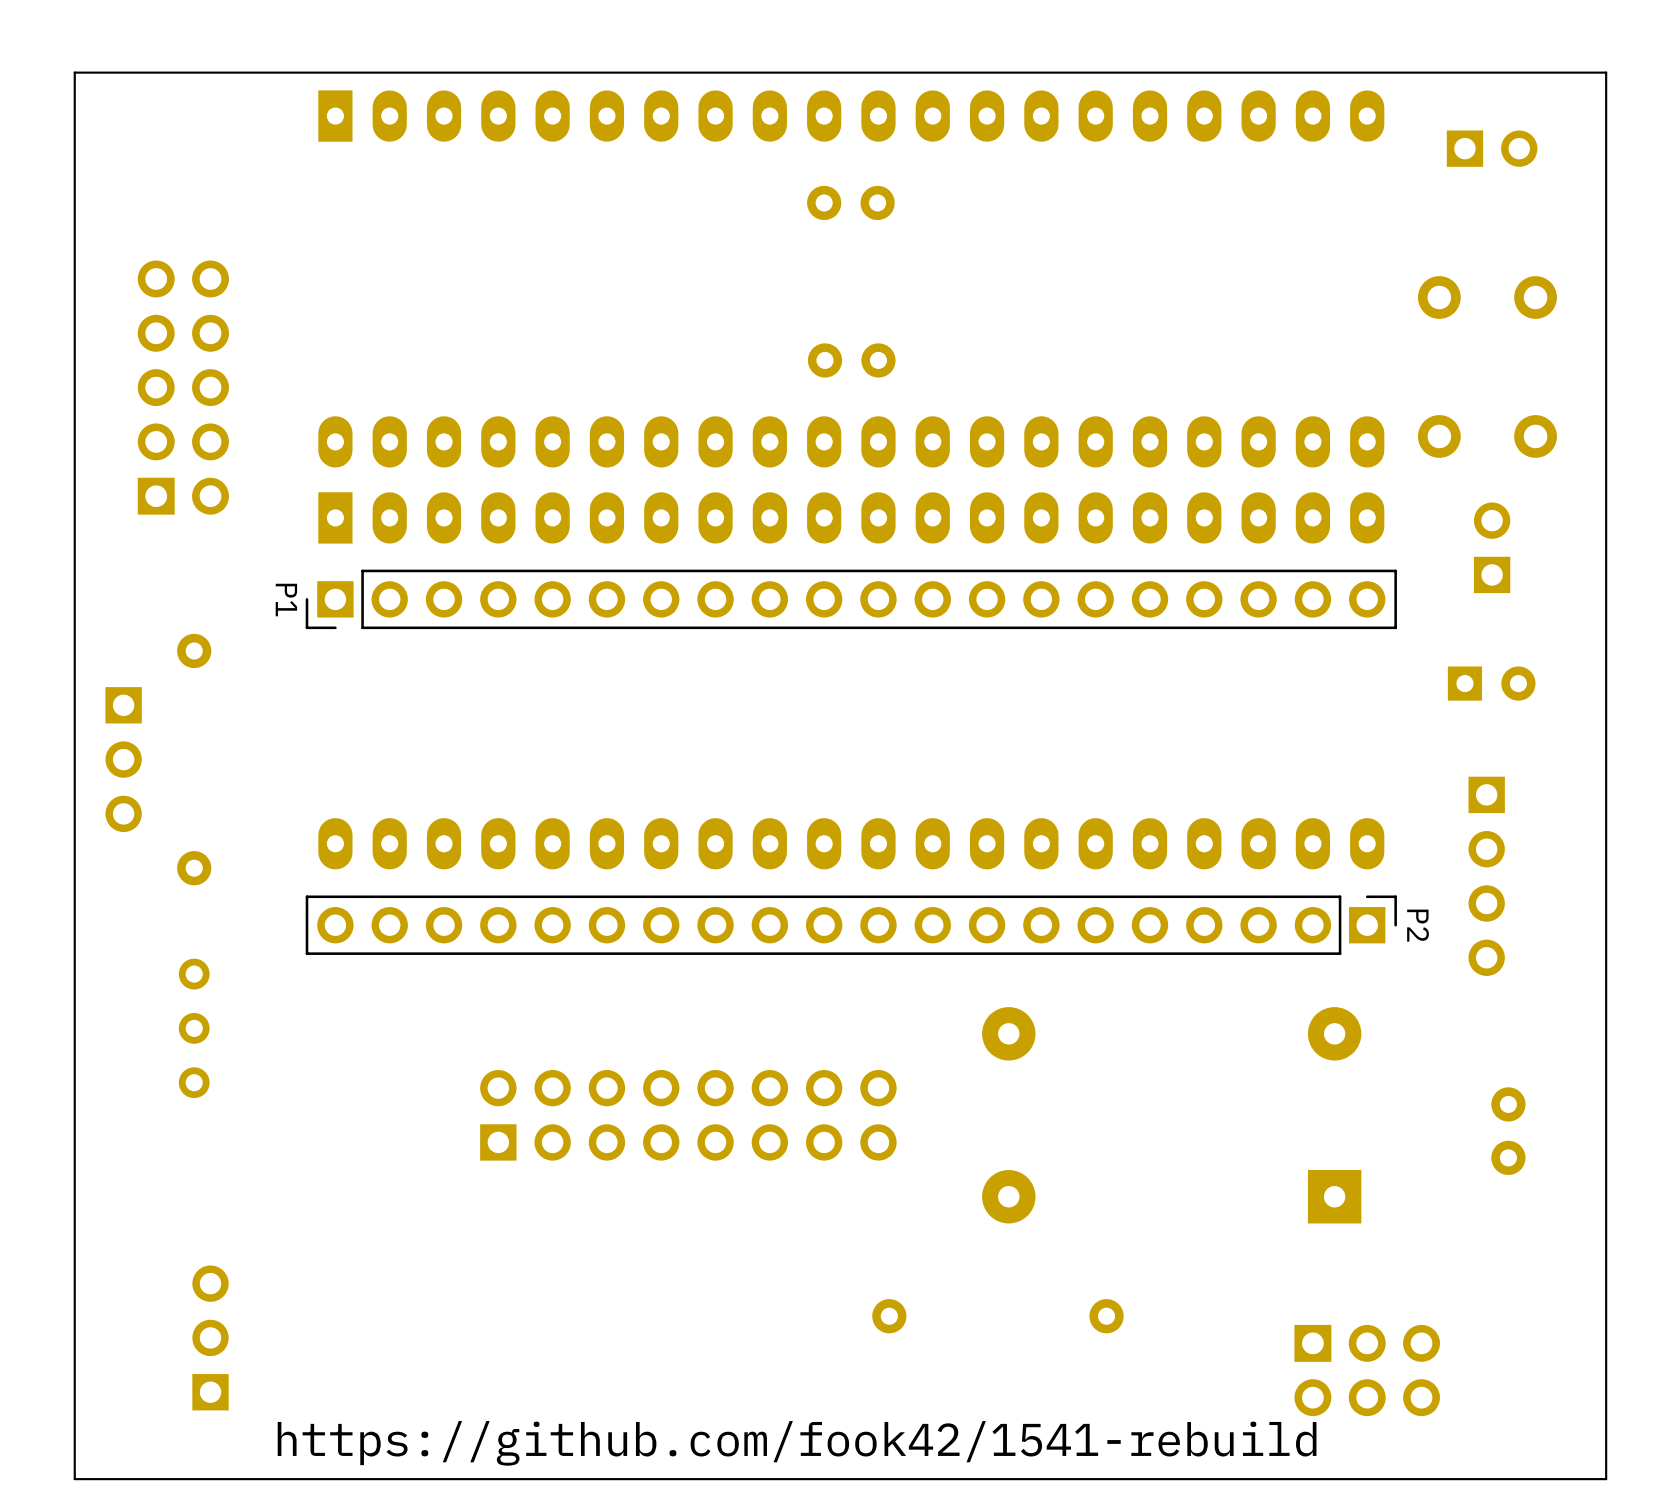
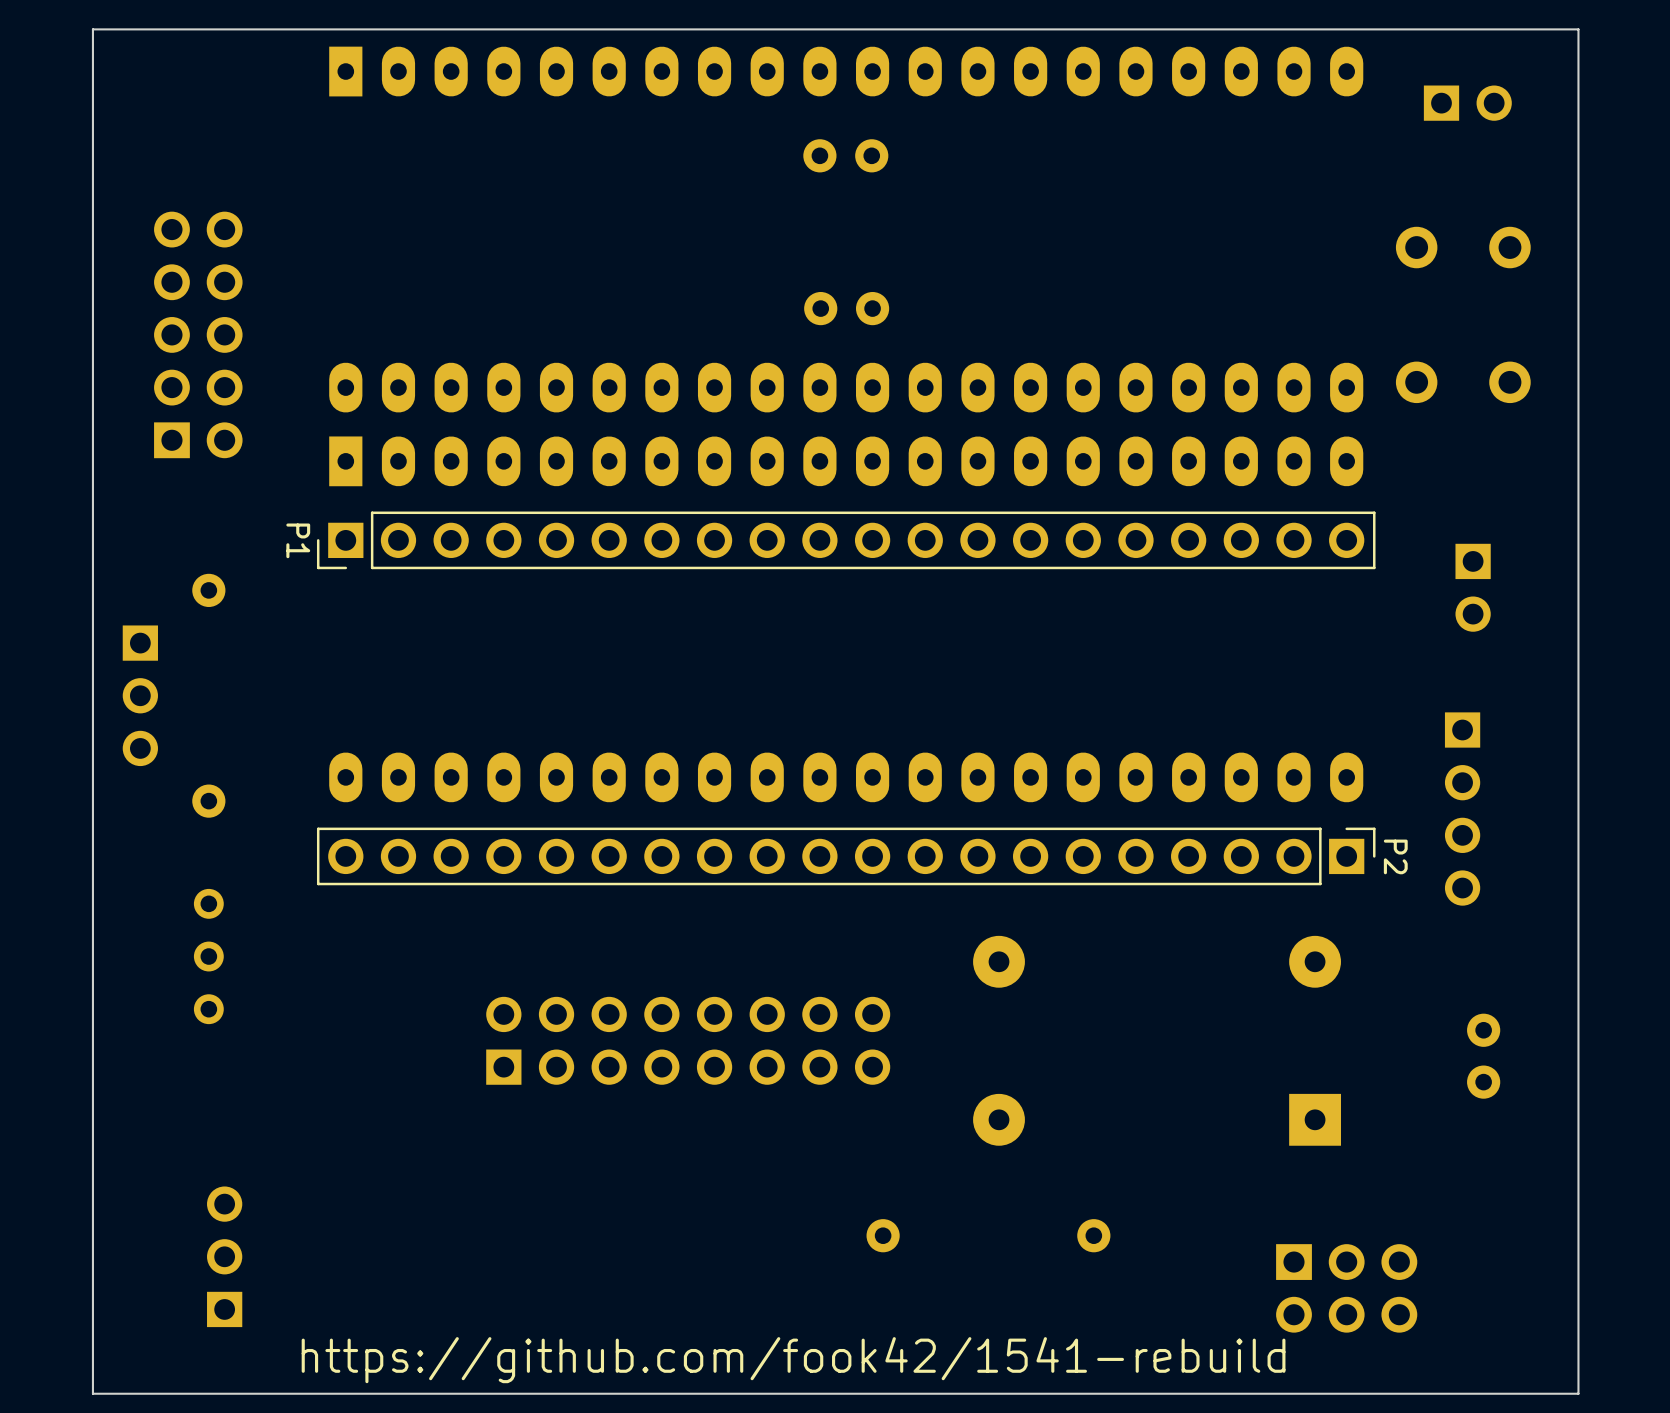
part rotation: 0° (1492, 547) -> 180° (1473, 587)
part position: (1492, 547) -> (1473, 587)
part: (1491, 683) -> none

